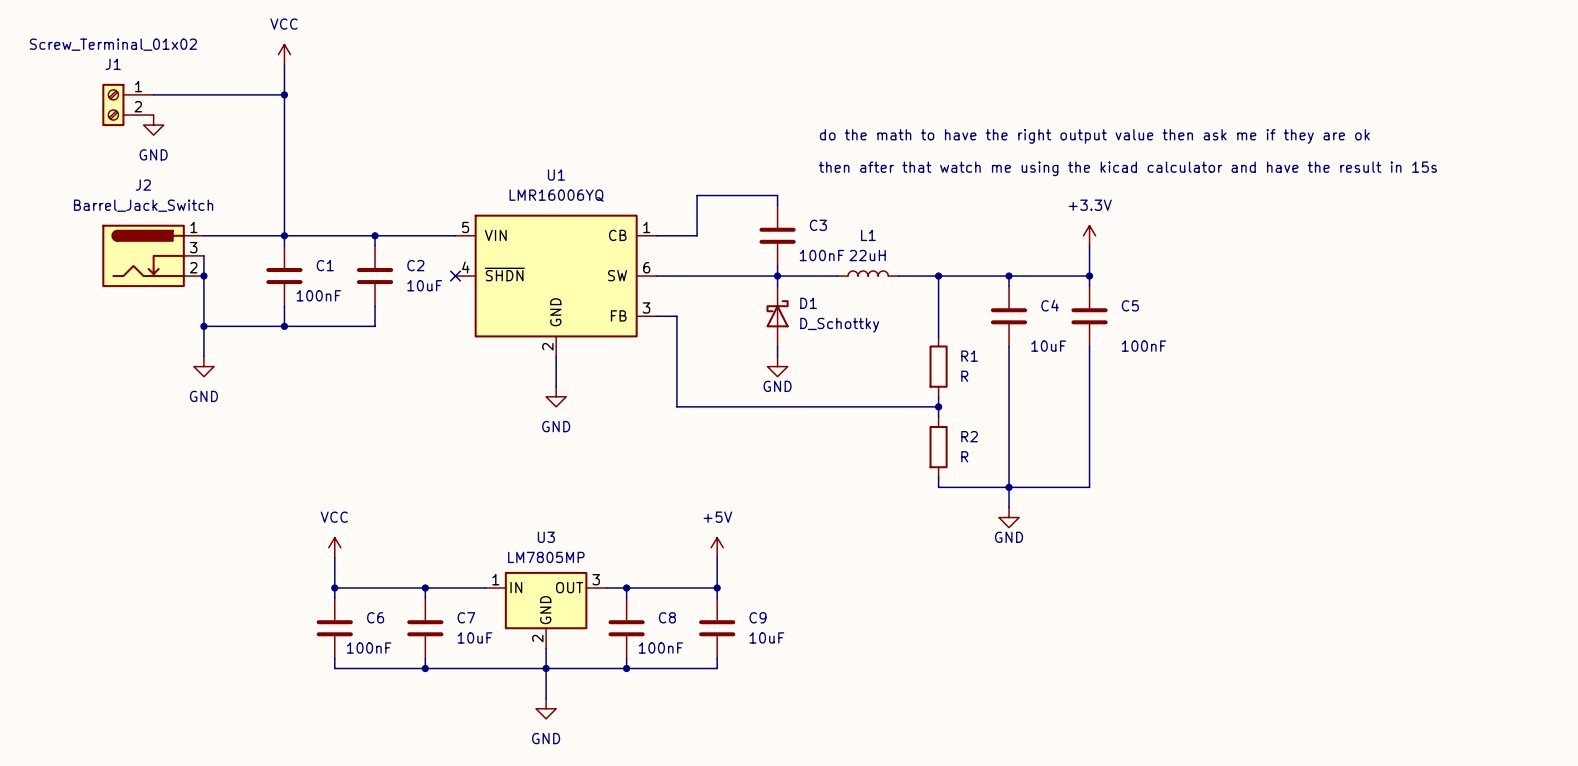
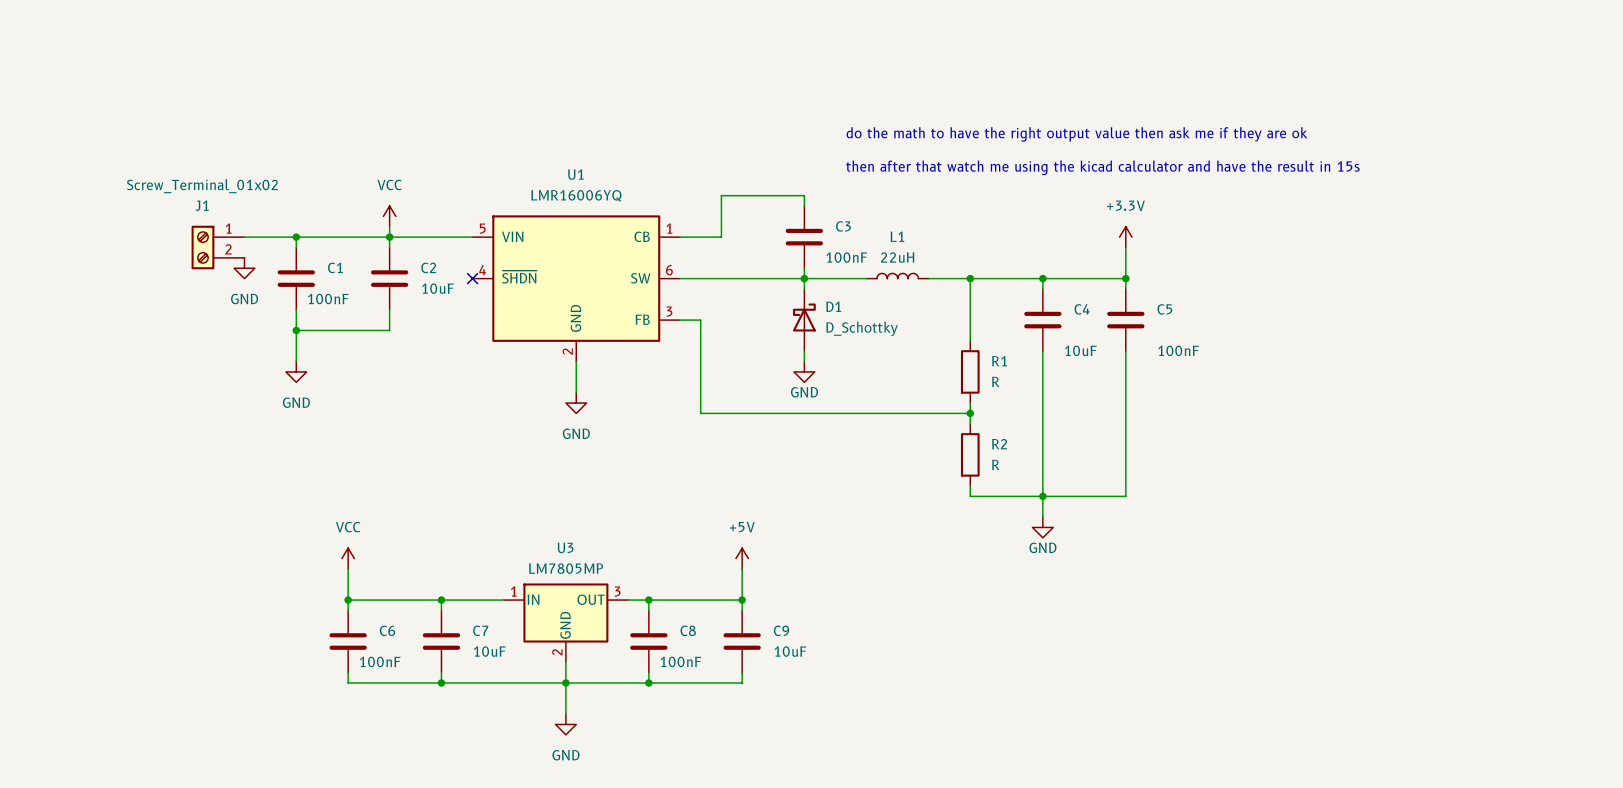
power symbol position: VCC (284, 54) -> VCC (389, 216)
wire: (284, 64) (284, 235) -> none
wire: (153, 94) (284, 94) -> none
junction: (284, 94) -> none
J1 position: (127, 104) -> (218, 247)
power symbol: GND (153, 125) -> none
wire: none -> (389, 226) (389, 237)
J2: Barrel_Jack_Switch (153, 255) -> none
wire: (203, 255) (203, 356) -> none
power symbol: none -> GND (244, 268)
junction: (203, 276) -> none
wire: (203, 326) (284, 326) -> (296, 361) (296, 330)
junction: (203, 326) -> none
power symbol: GND (203, 366) -> none
power symbol: none -> GND (296, 371)

